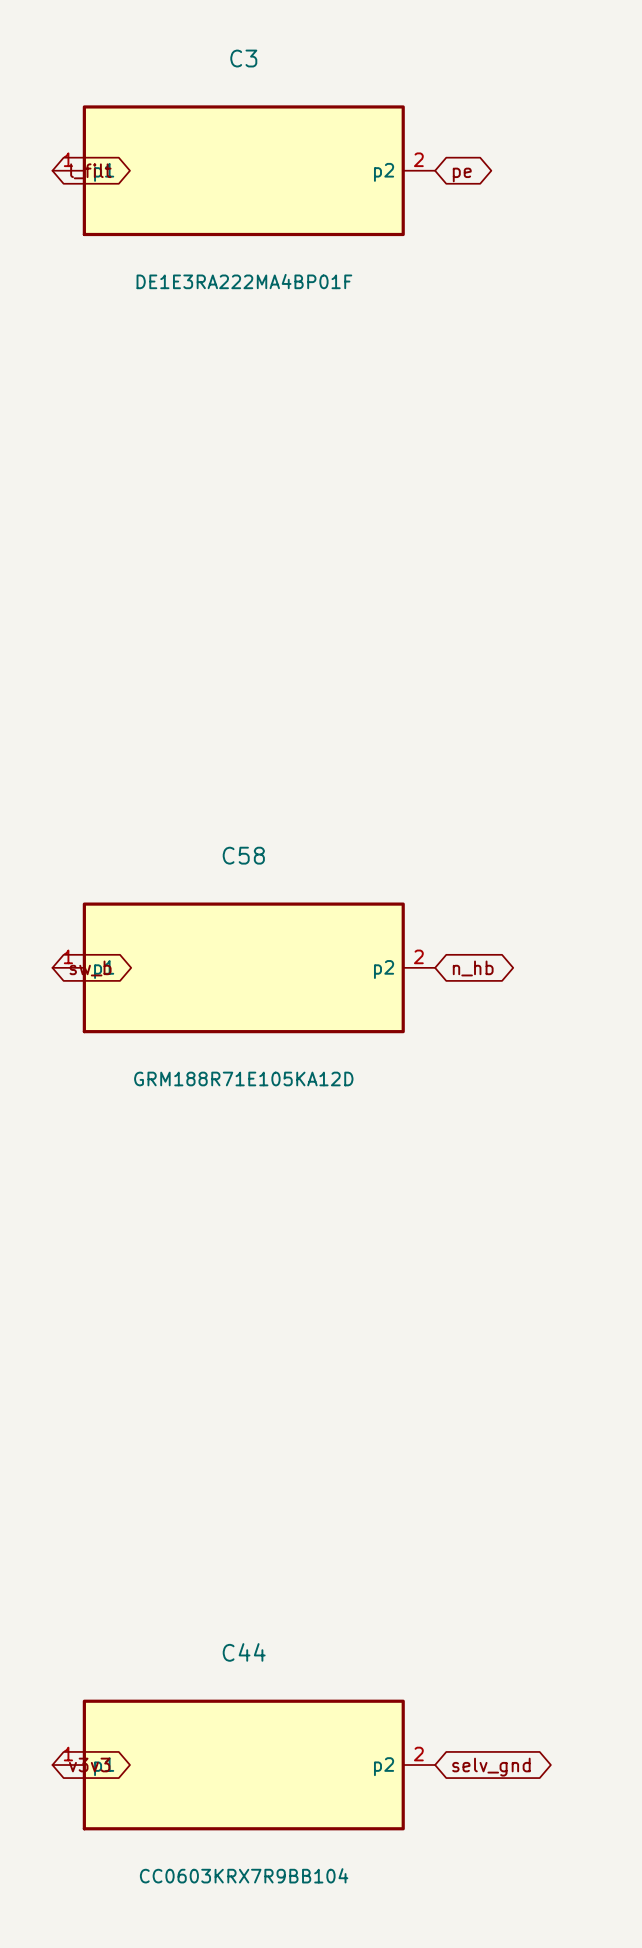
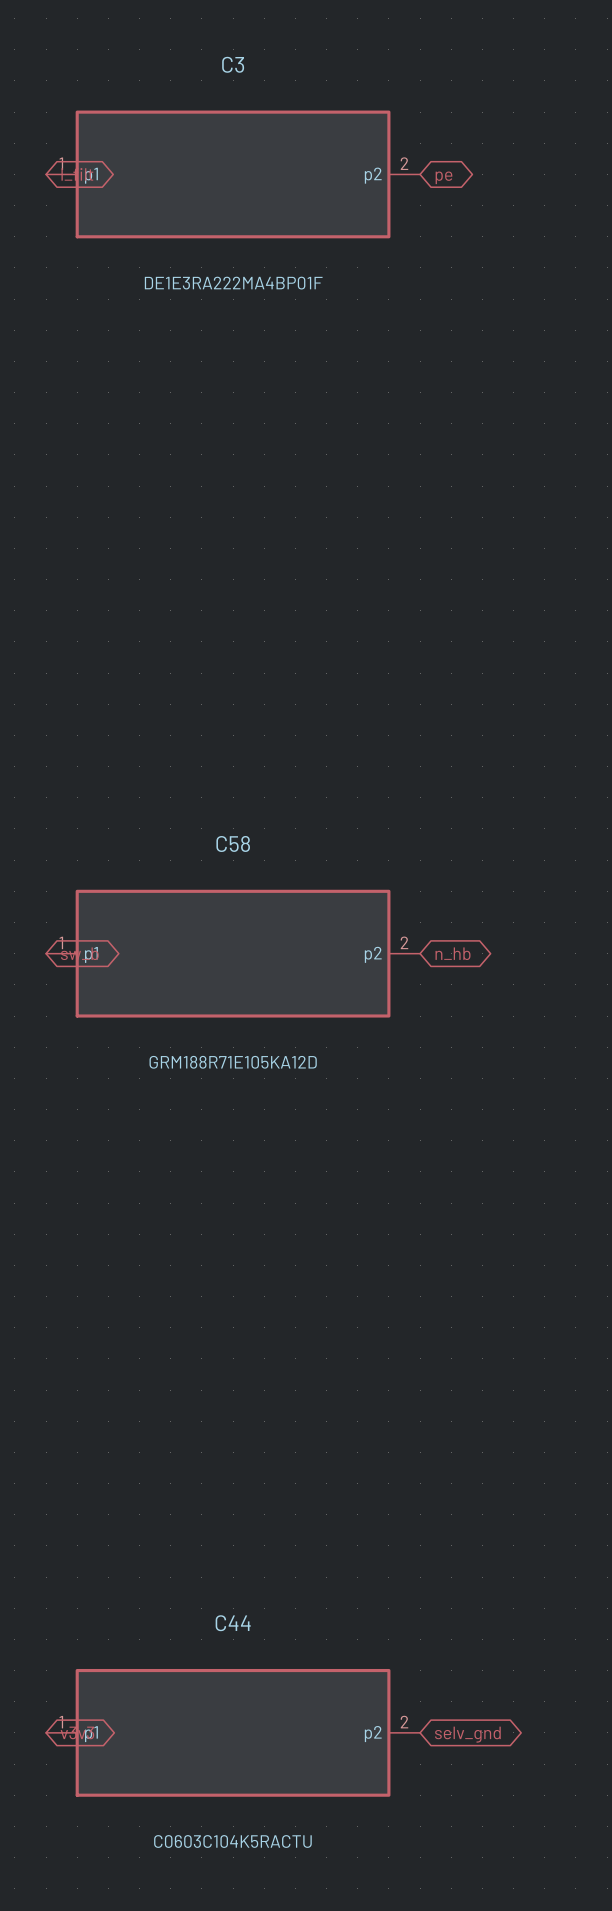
C44 value: CC0603KRX7R9BB104 (244, 1875) -> C0603C104K5RACTU (232, 1841)

